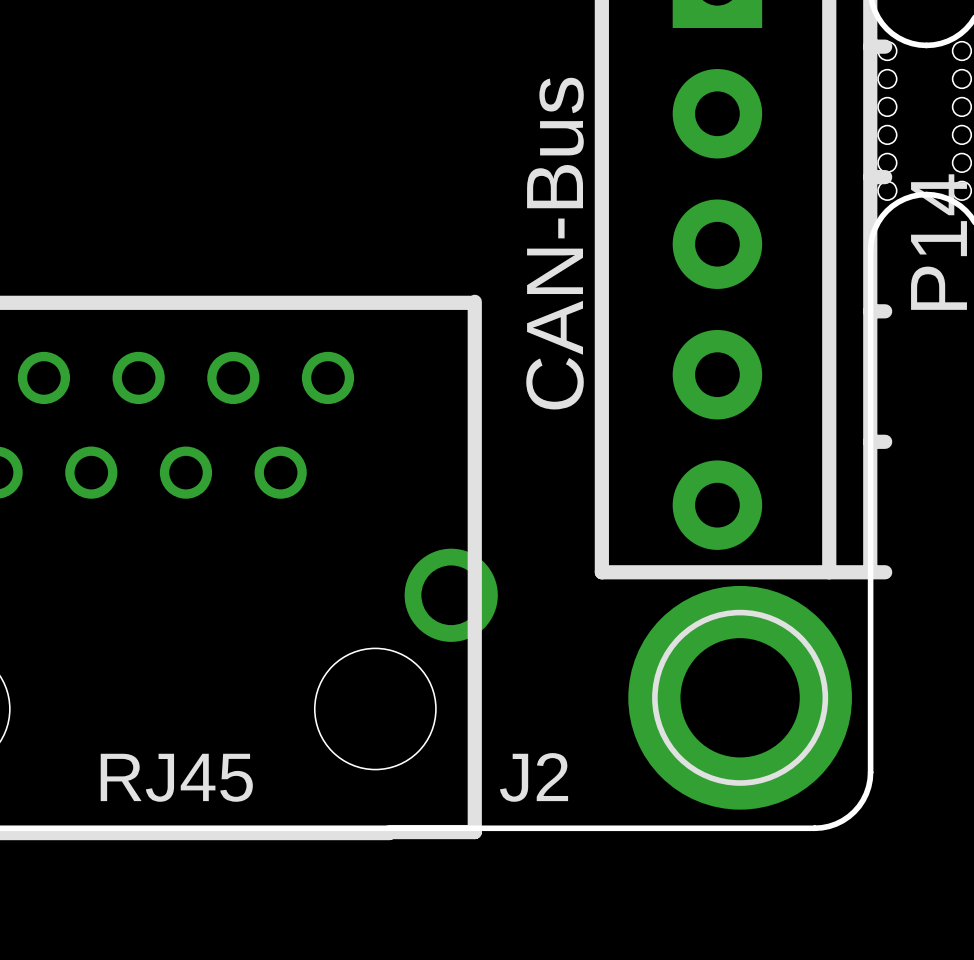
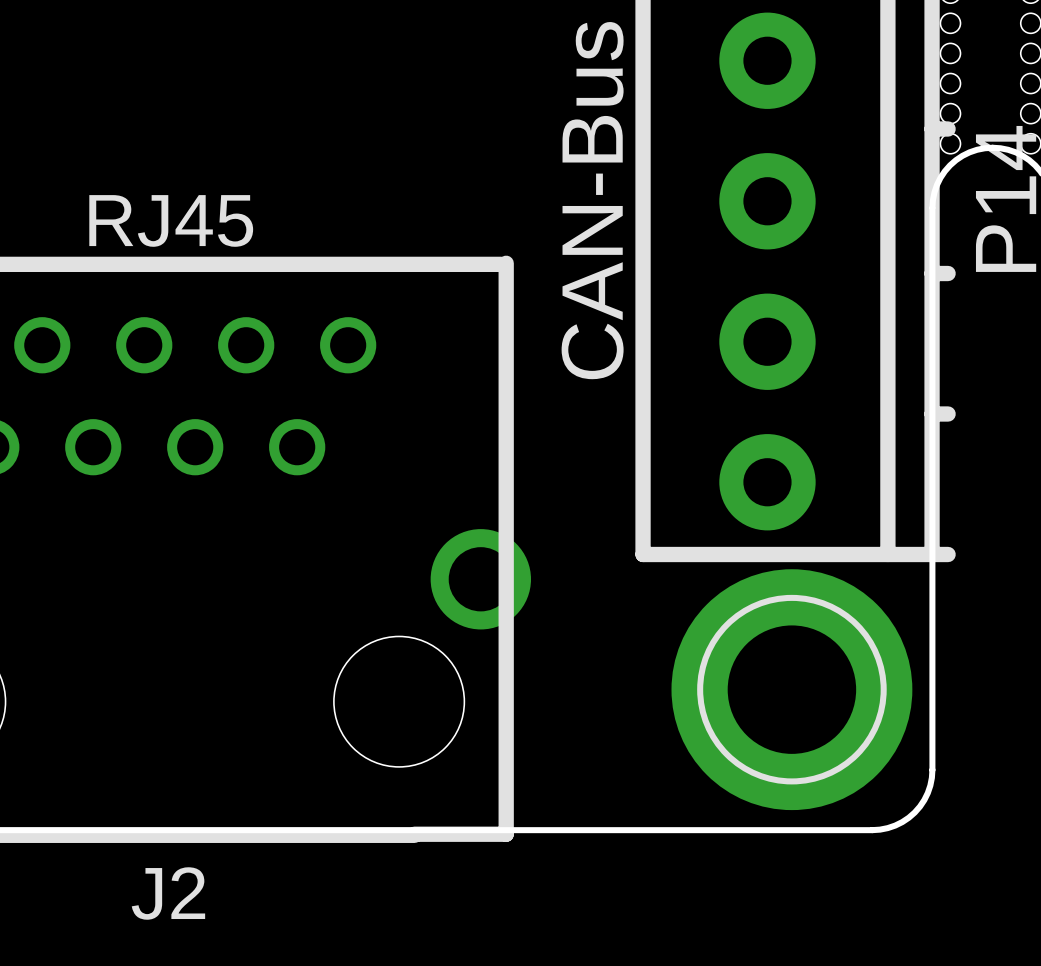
J2 value position: RJ45 (176, 777) -> RJ45 (171, 220)
J2 name position: J2 (534, 777) -> J2 (168, 893)

